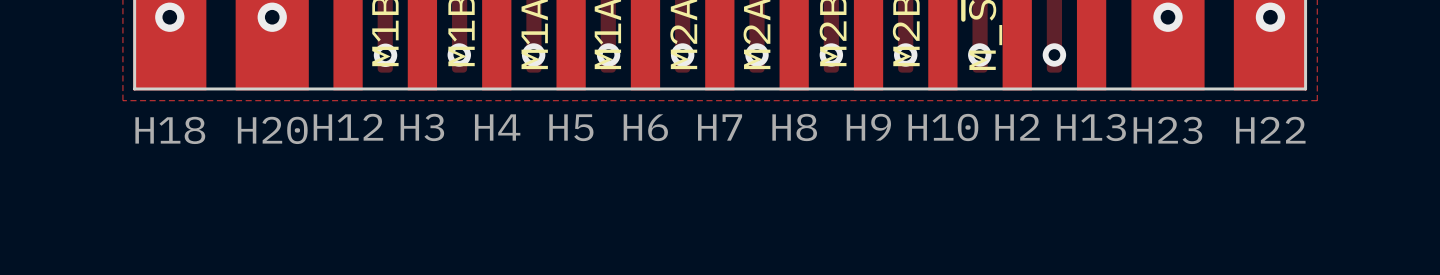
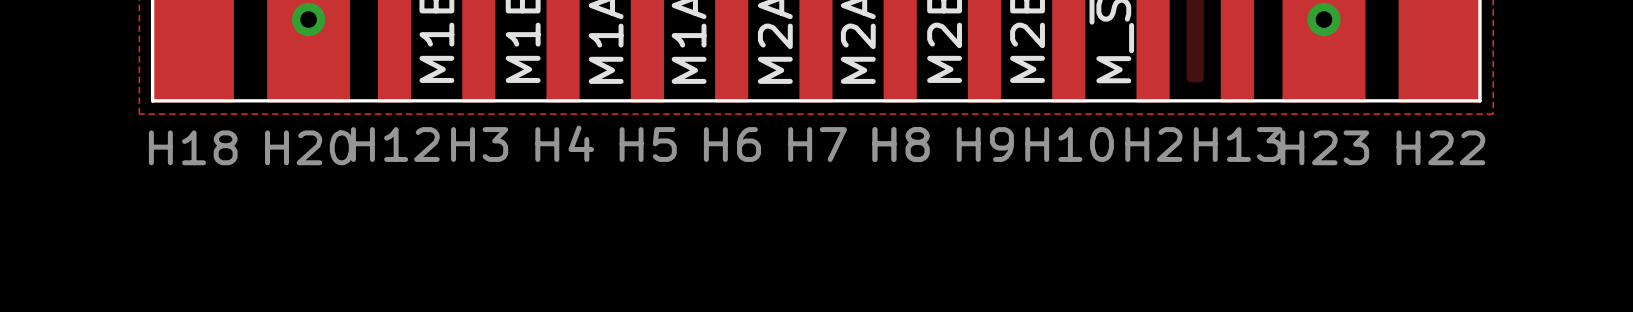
via: (169, 17) -> none
via: (1270, 17) -> none
via: (385, 55) -> none
via: (459, 55) -> none
via: (533, 55) -> none
via: (608, 55) -> none
via: (682, 55) -> none
via: (757, 55) -> none
via: (831, 55) -> none
via: (905, 55) -> none
via: (979, 55) -> none
via: (1054, 55) -> none

